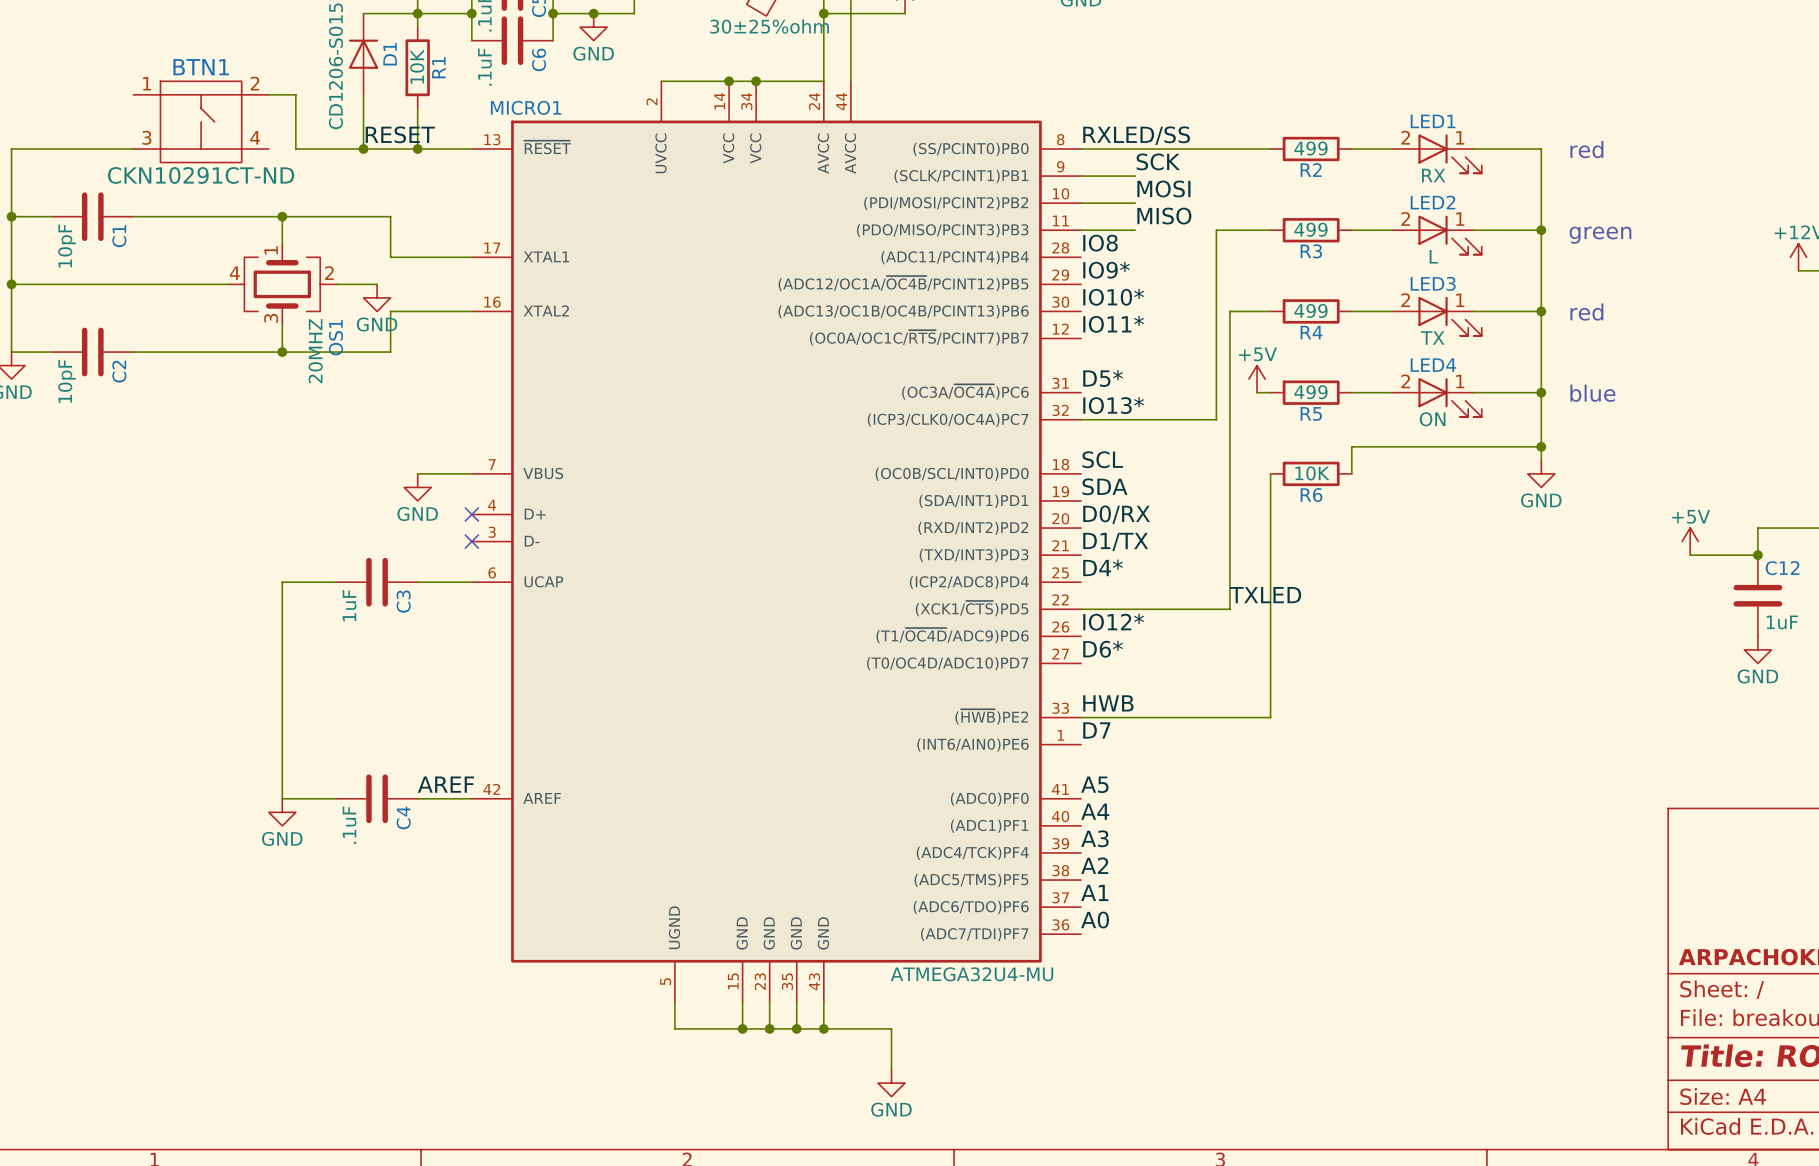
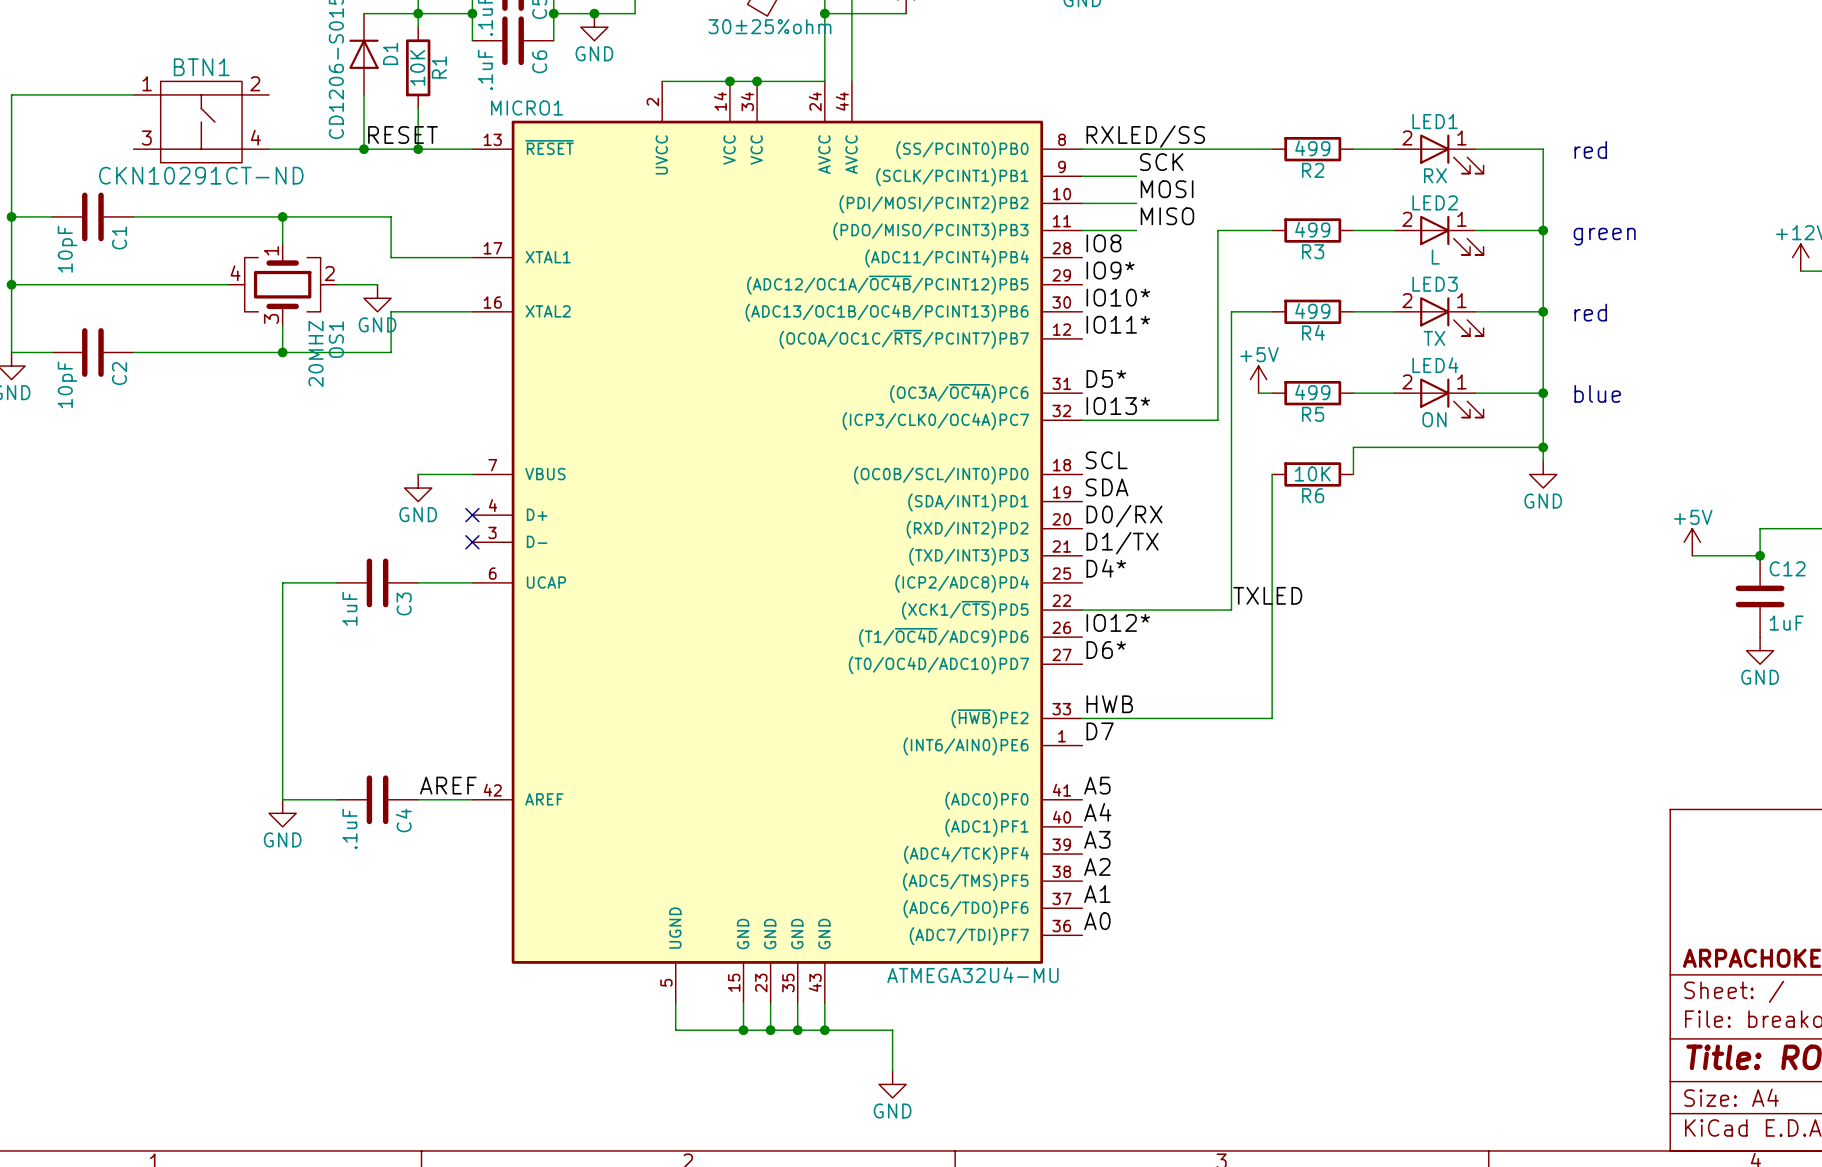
wire: (268, 94) (295, 94) (295, 148) -> (269, 149) (296, 149)
wire: (11, 148) (133, 148) -> (11, 149) (11, 94) (133, 94)

